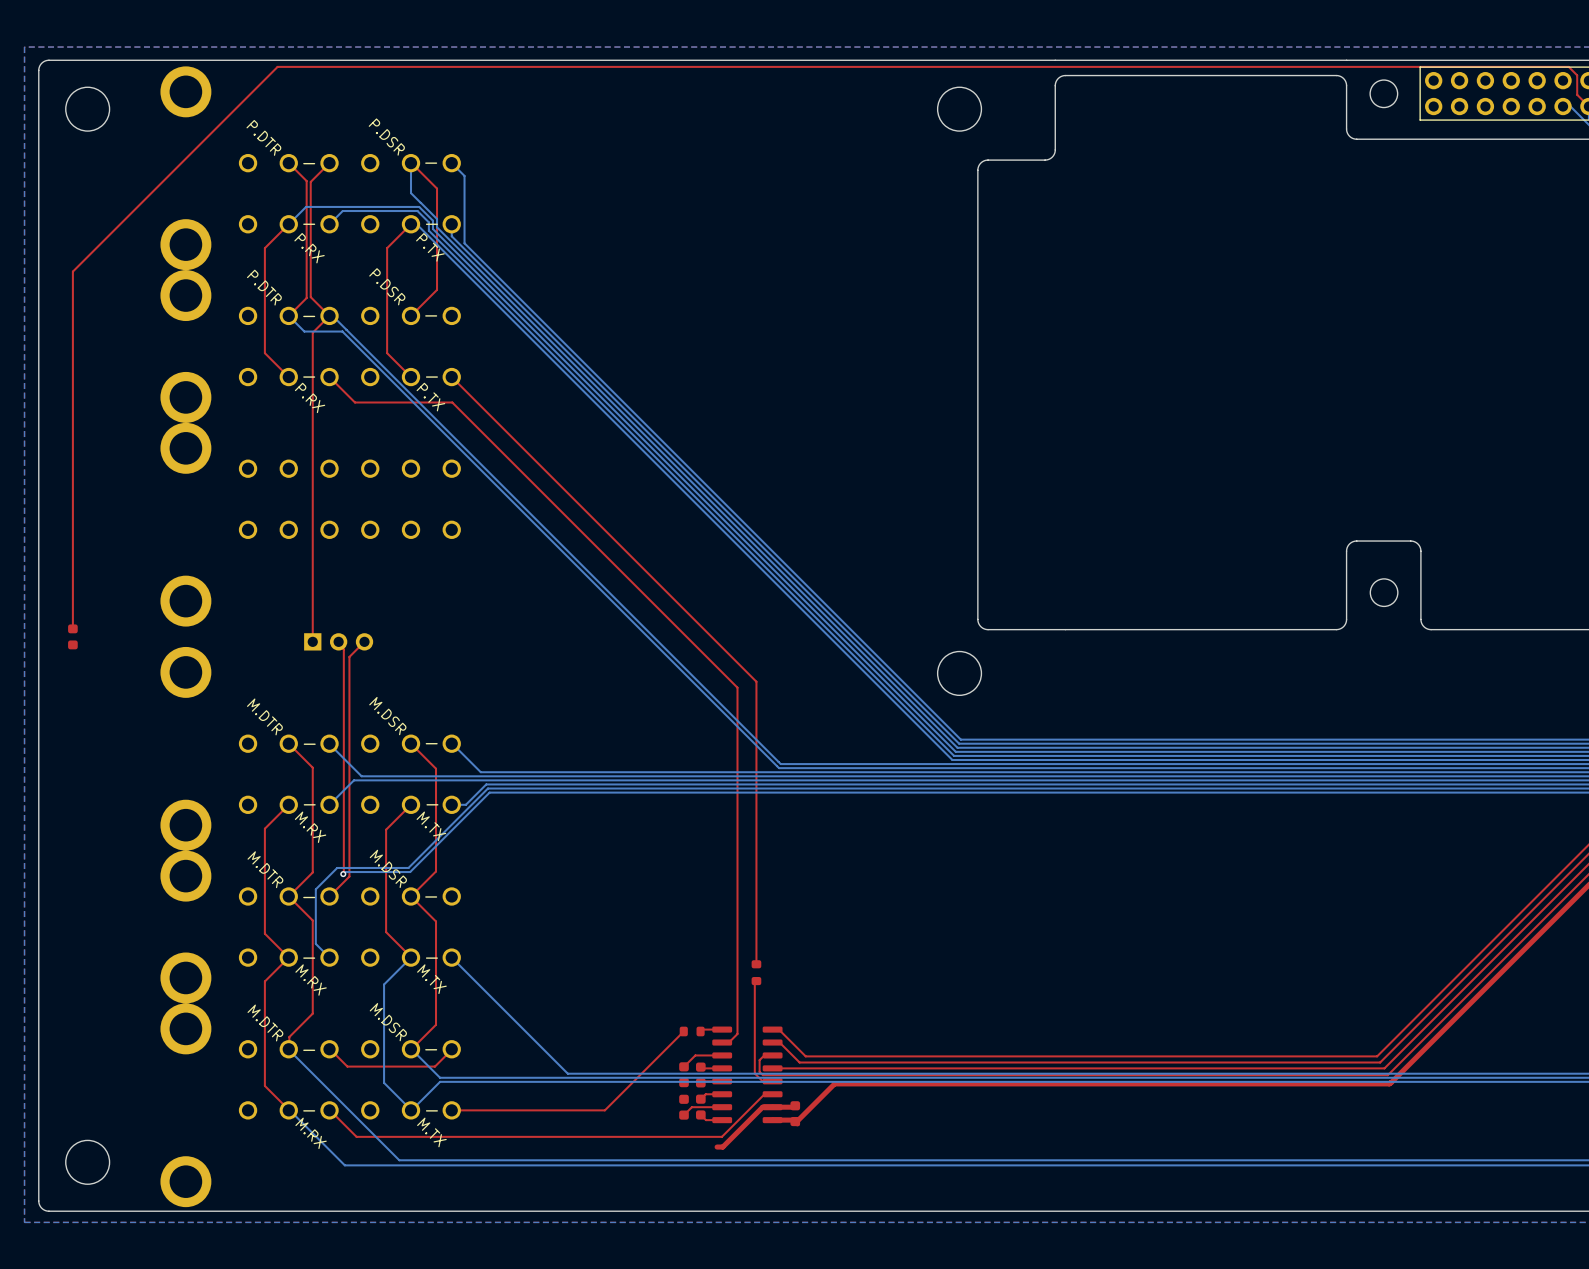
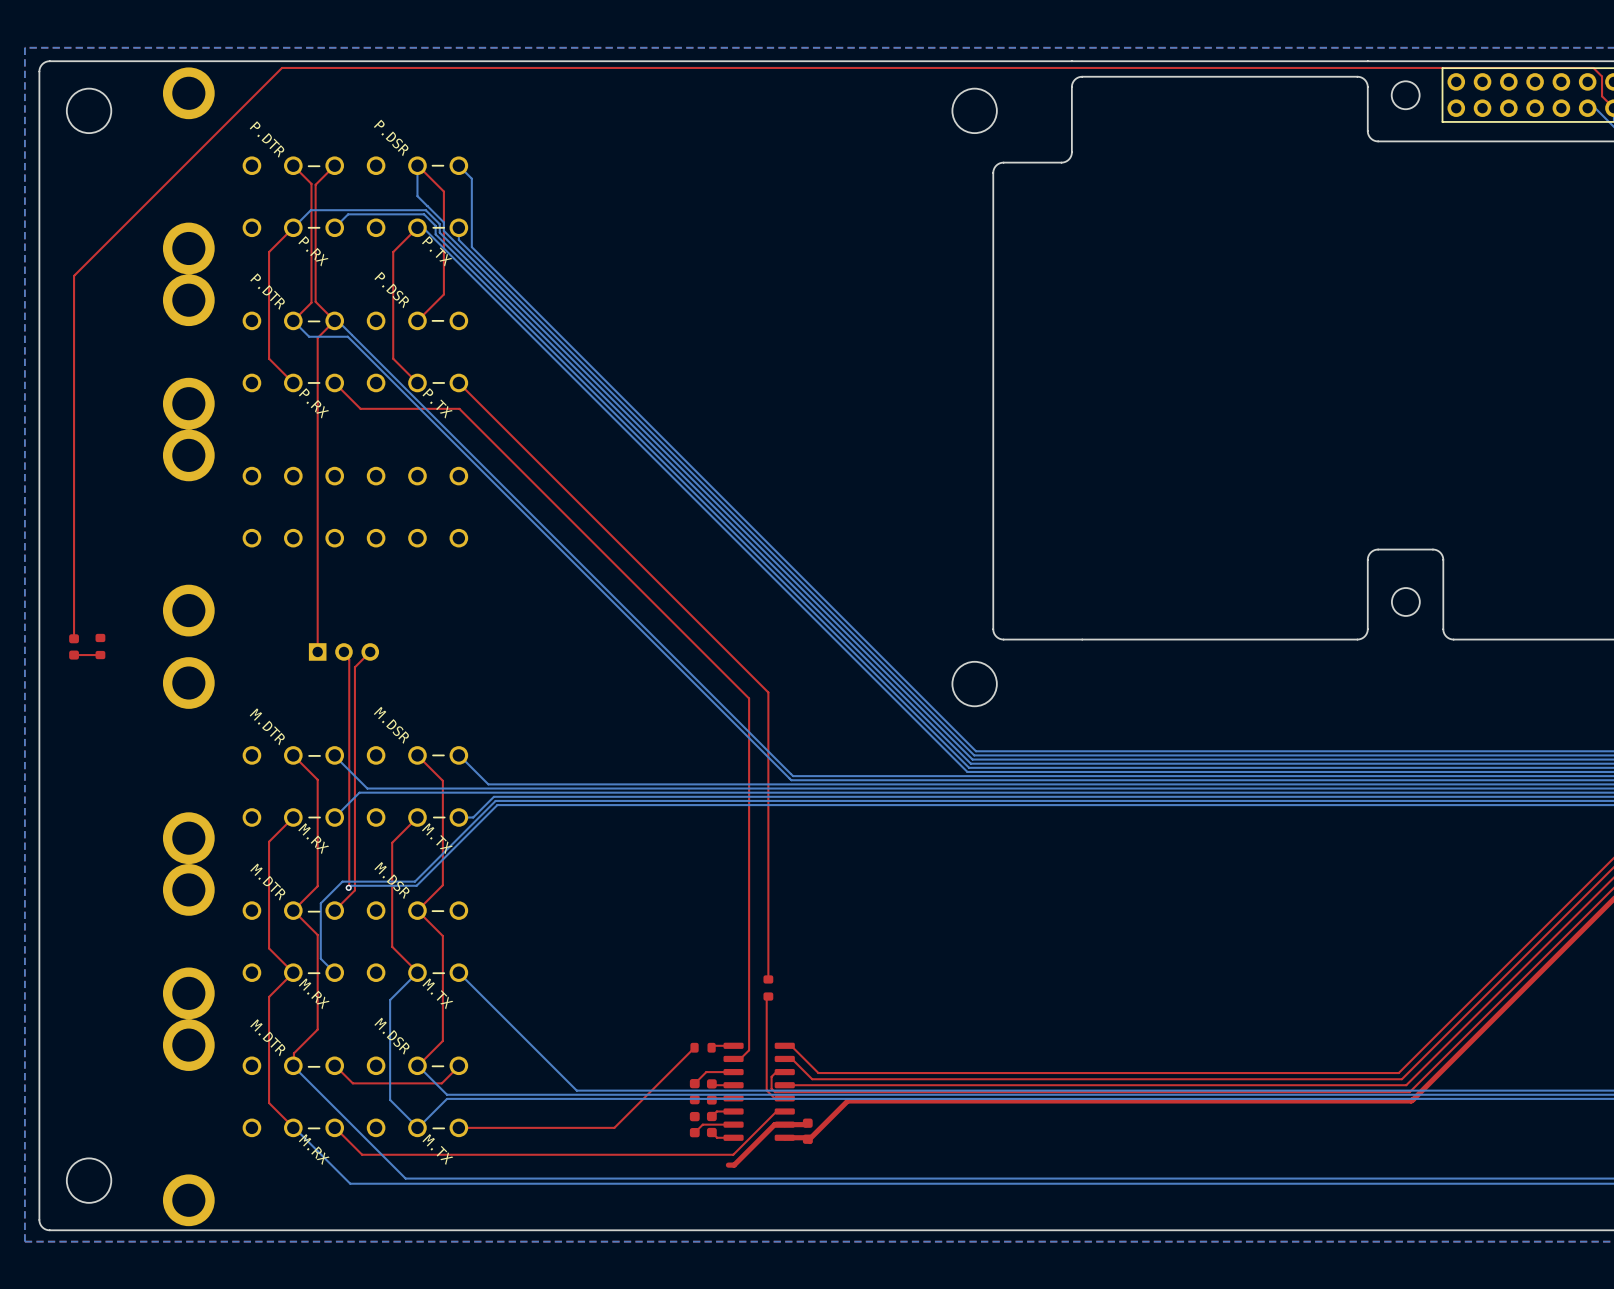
part: none -> (100, 646)
top track: none -> (100, 655) (74, 655)

